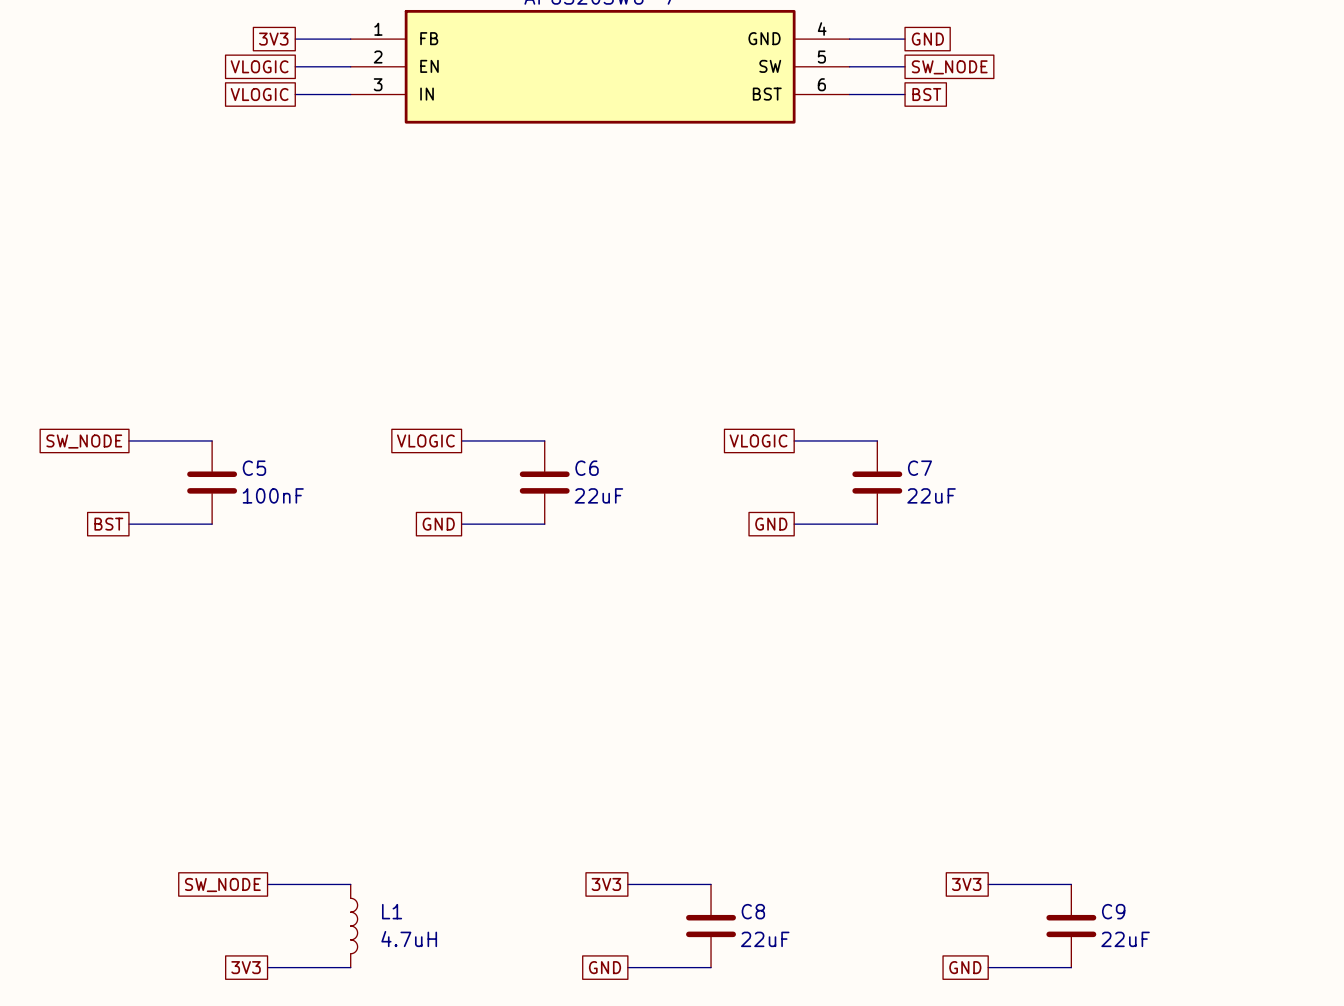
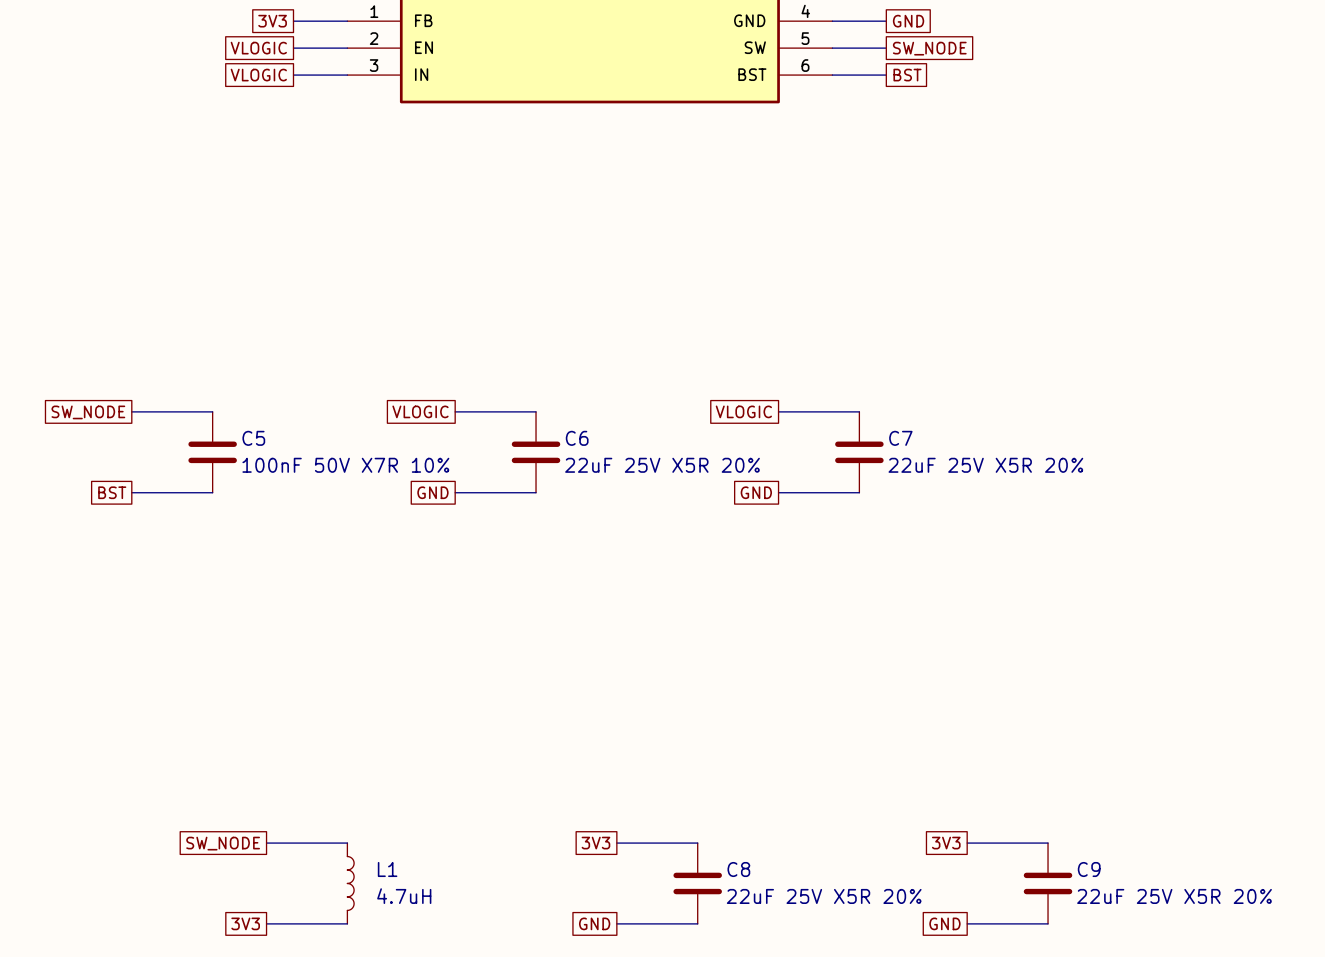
C5 value: 100nF (273, 495) -> 100nF 50V X7R 10% (345, 465)
C6 value: 22uF (598, 495) -> 22uF 25V X5R 20% (662, 465)
C7 value: 22uF (931, 495) -> 22uF 25V X5R 20% (985, 465)
C8 value: 22uF (765, 939) -> 22uF 25V X5R 20% (824, 896)
C9 value: 22uF (1125, 939) -> 22uF 25V X5R 20% (1174, 896)

